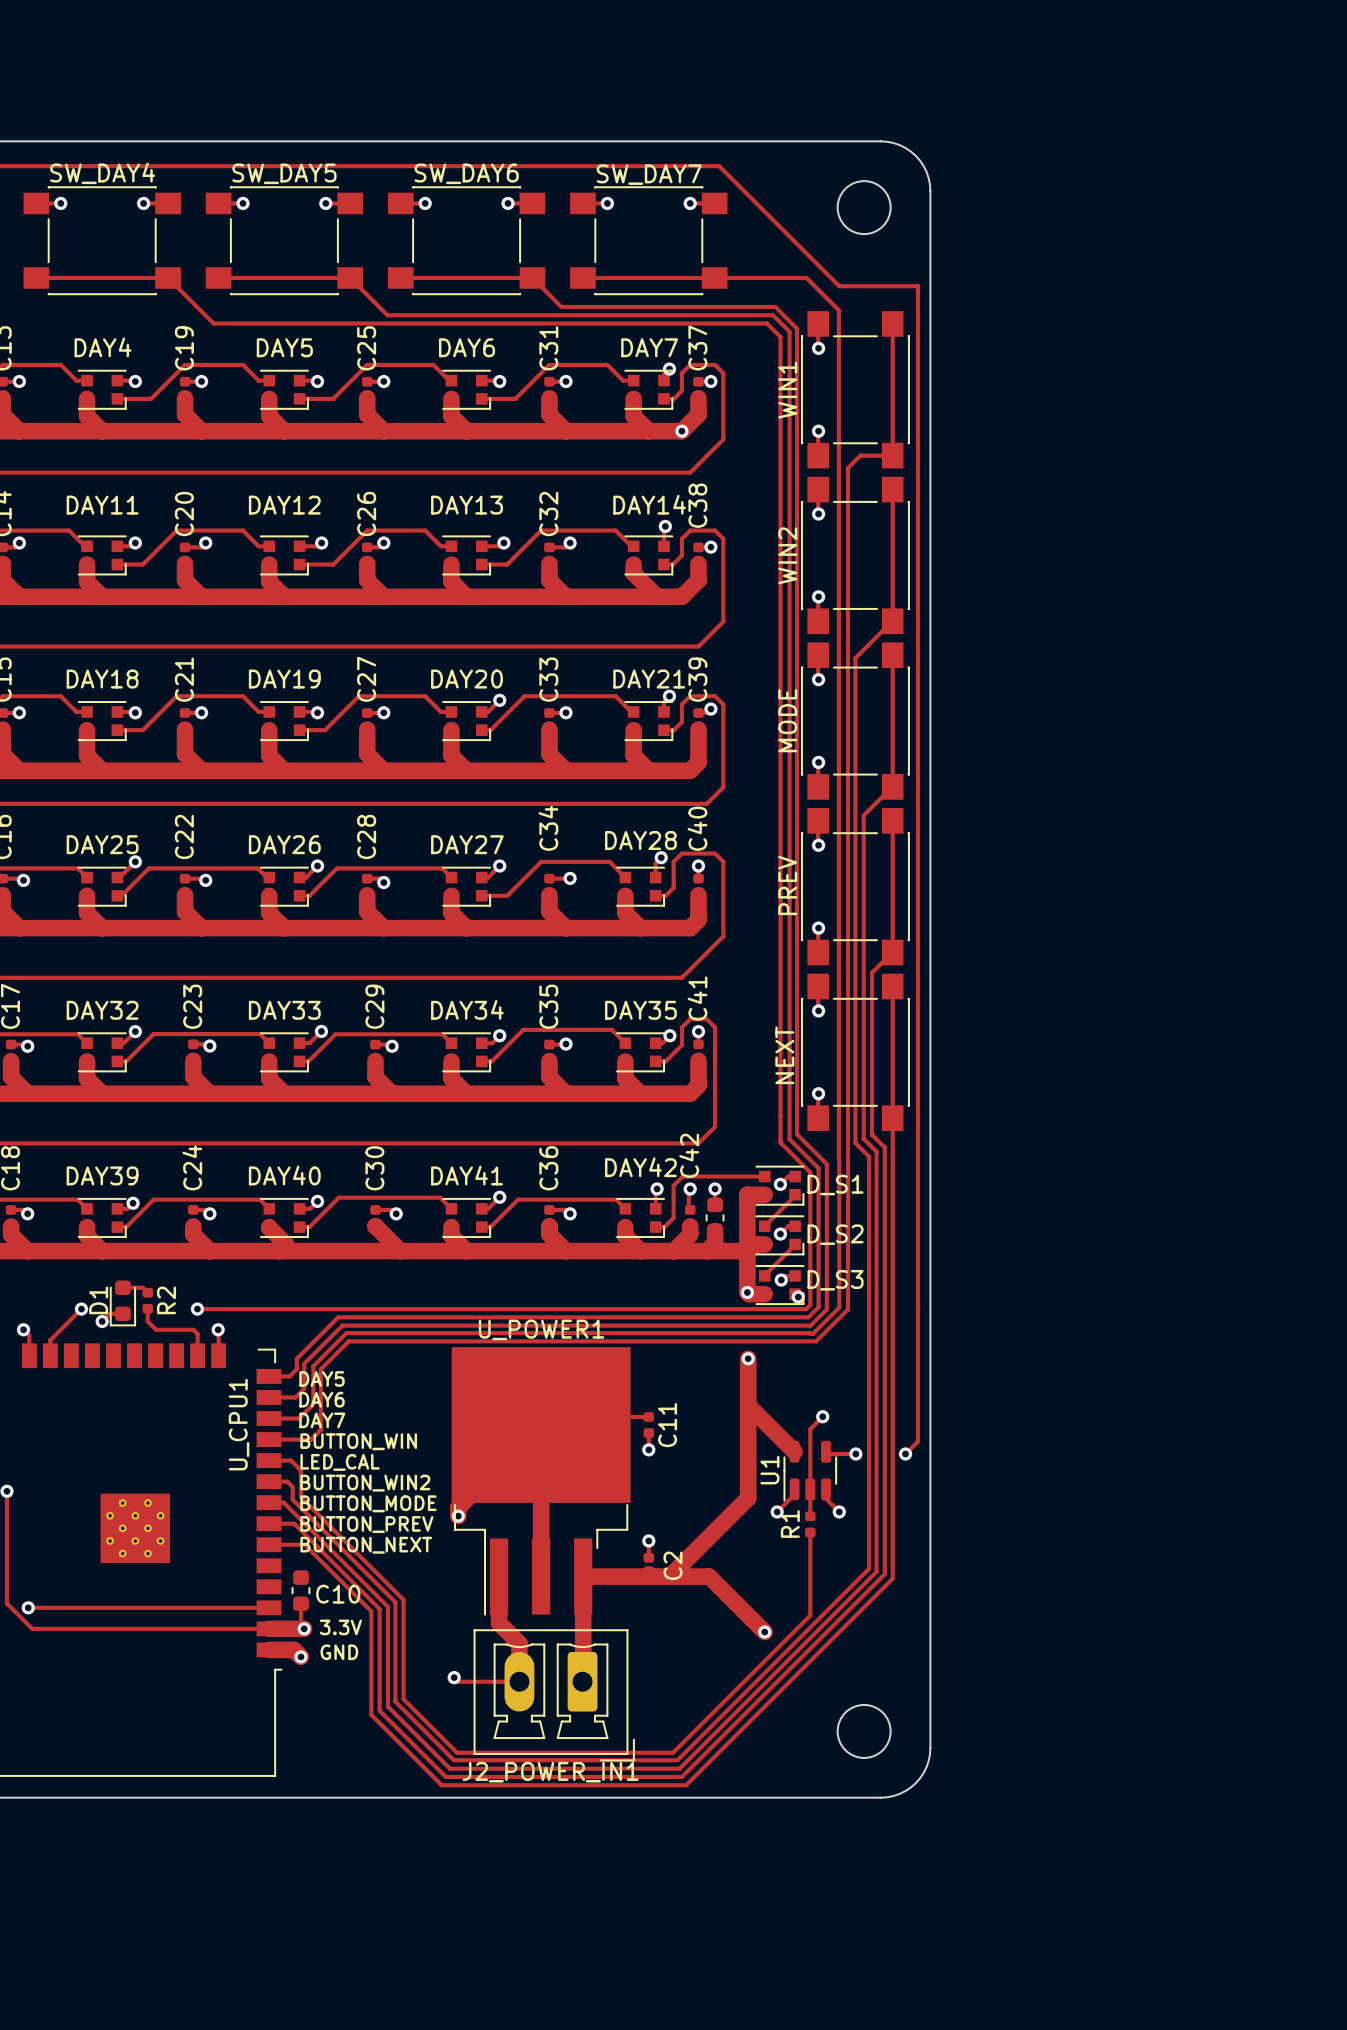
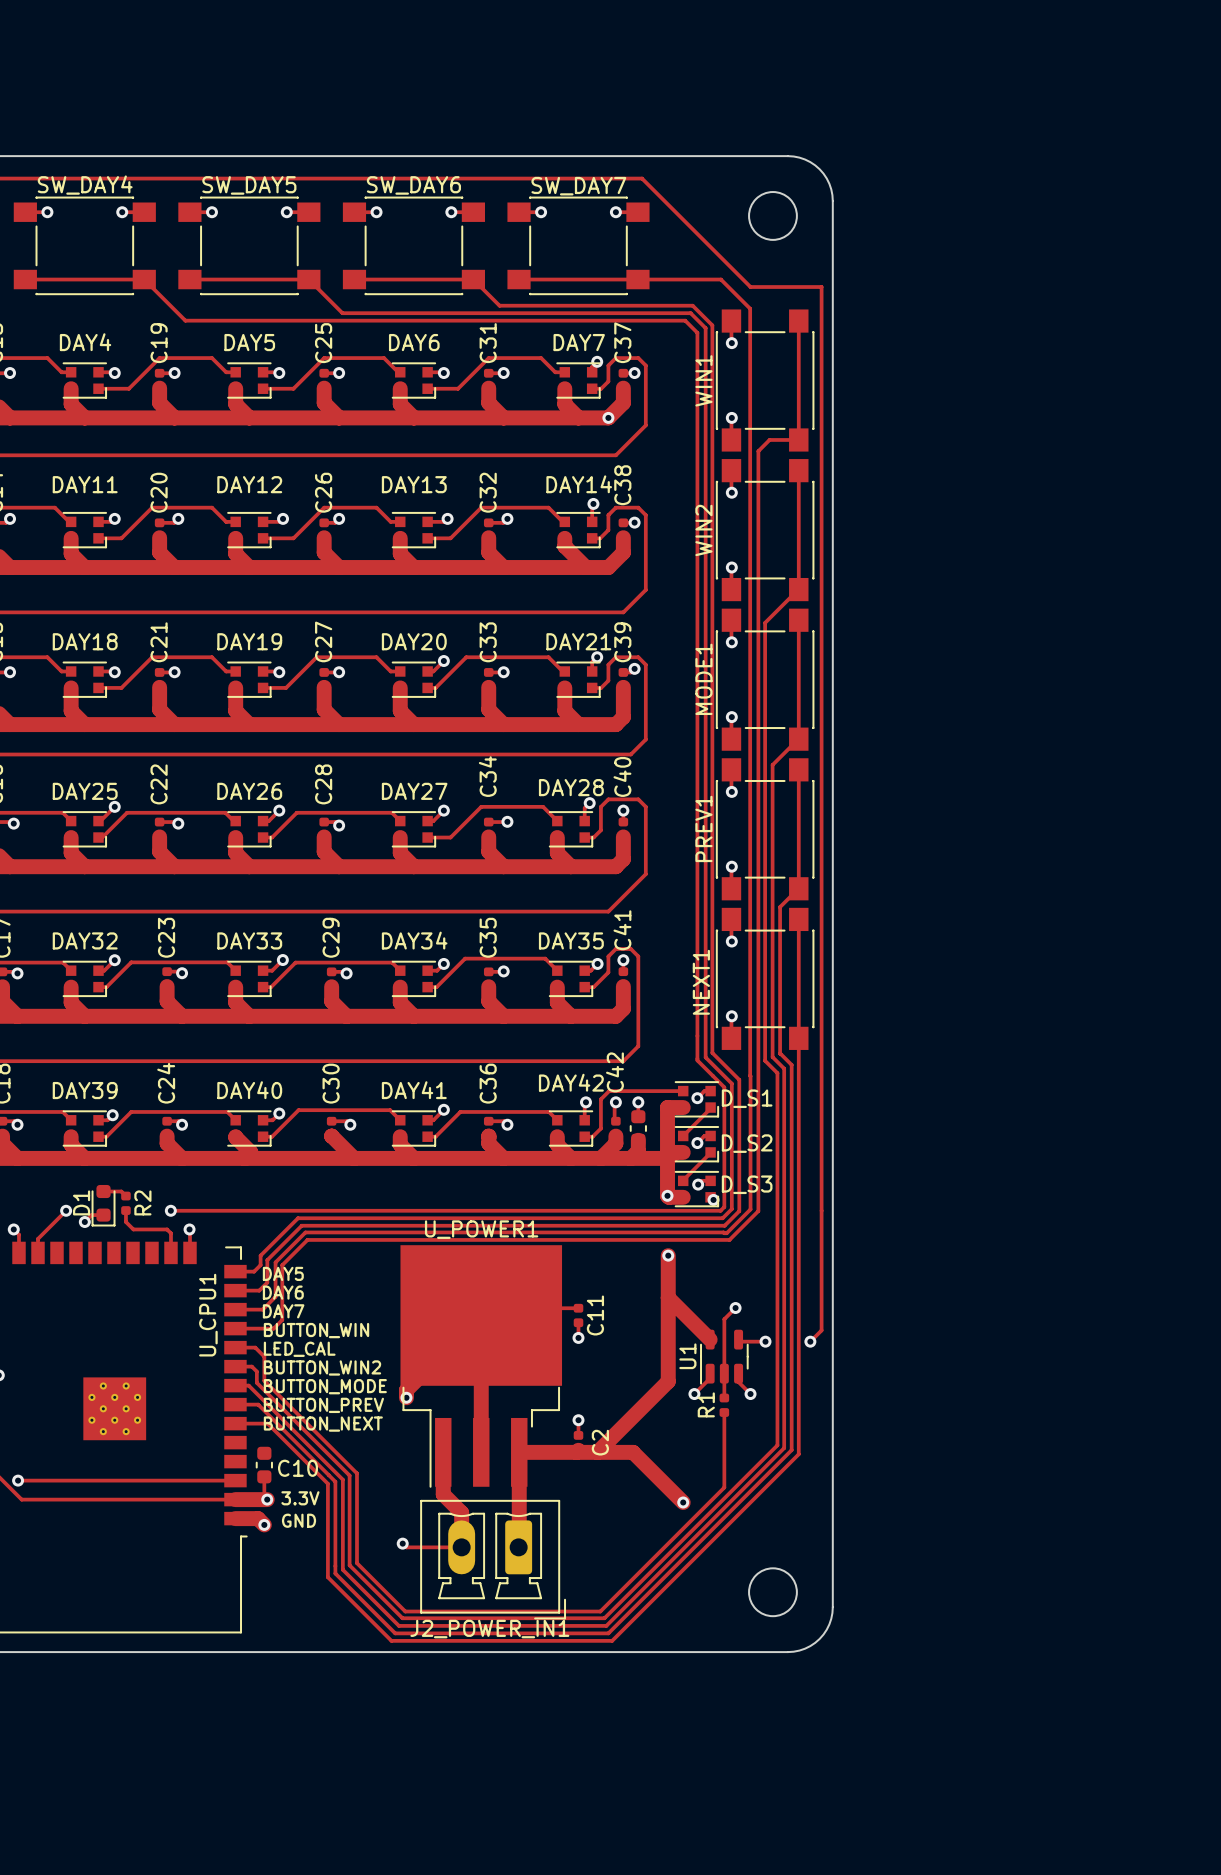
MODE name: MODE (787, 720) -> MODE1 (703, 679)
PREV name: PREV (787, 885) -> PREV1 (703, 828)
NEXT name: NEXT (784, 1055) -> NEXT1 (701, 982)

